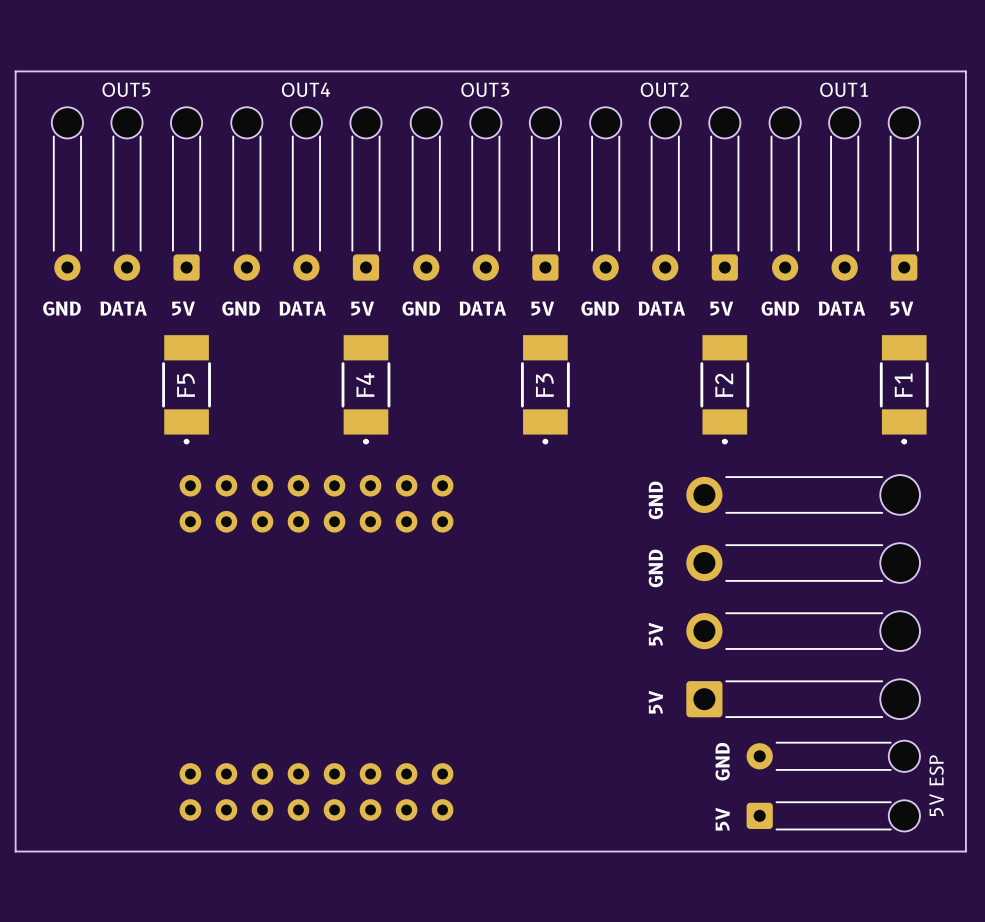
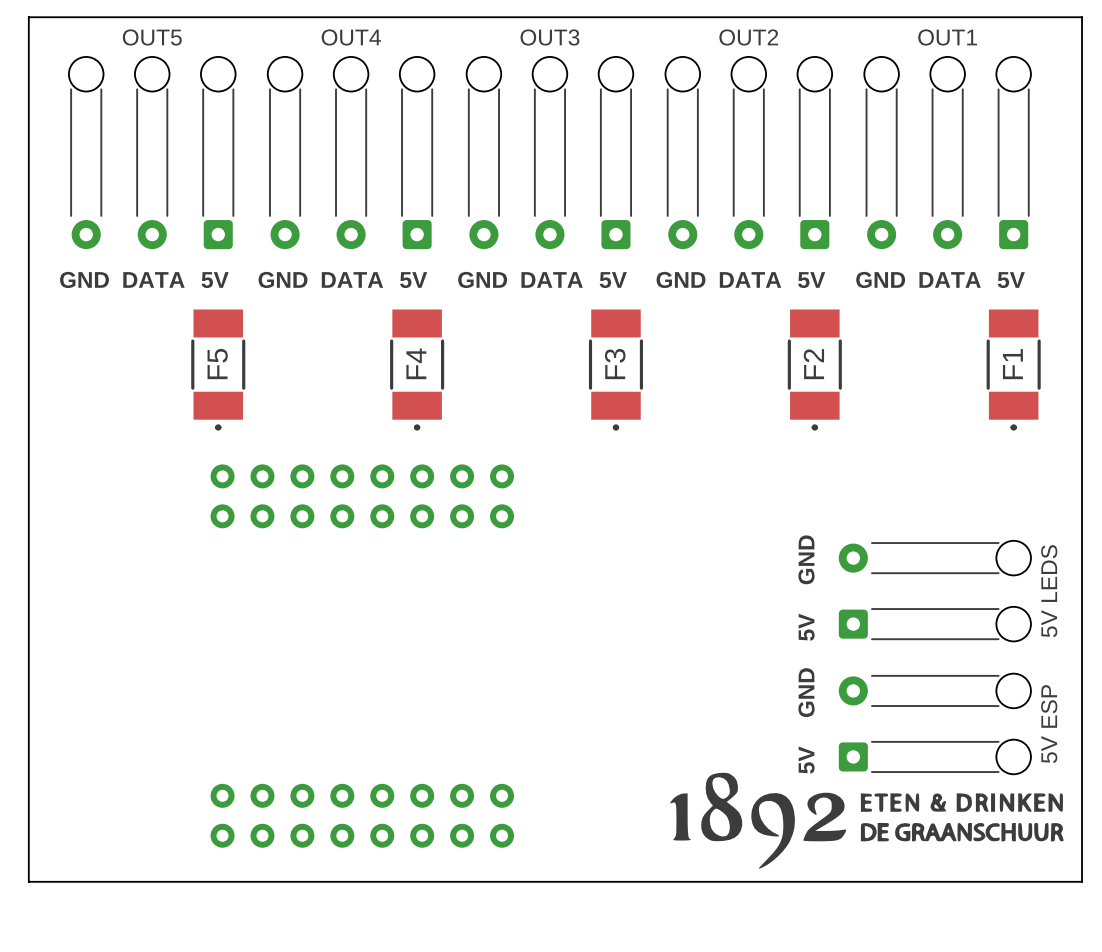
text: GND (655, 500) -> none
text: none -> GND (806, 559)
text: GND (655, 568) -> none
part: none -> 5V LEDS (934, 591)
part: (803, 597) -> none
text: none -> 5V (806, 627)
text: 5V (655, 634) -> none
text: none -> GND (806, 692)
text: 5V (655, 702) -> none
text: none -> 5V (806, 760)
drawing: none -> [670, 772, 1064, 869]
text: GND (722, 761) -> none
part position: (833, 786) -> (934, 723)
text: 5V (722, 819) -> none

